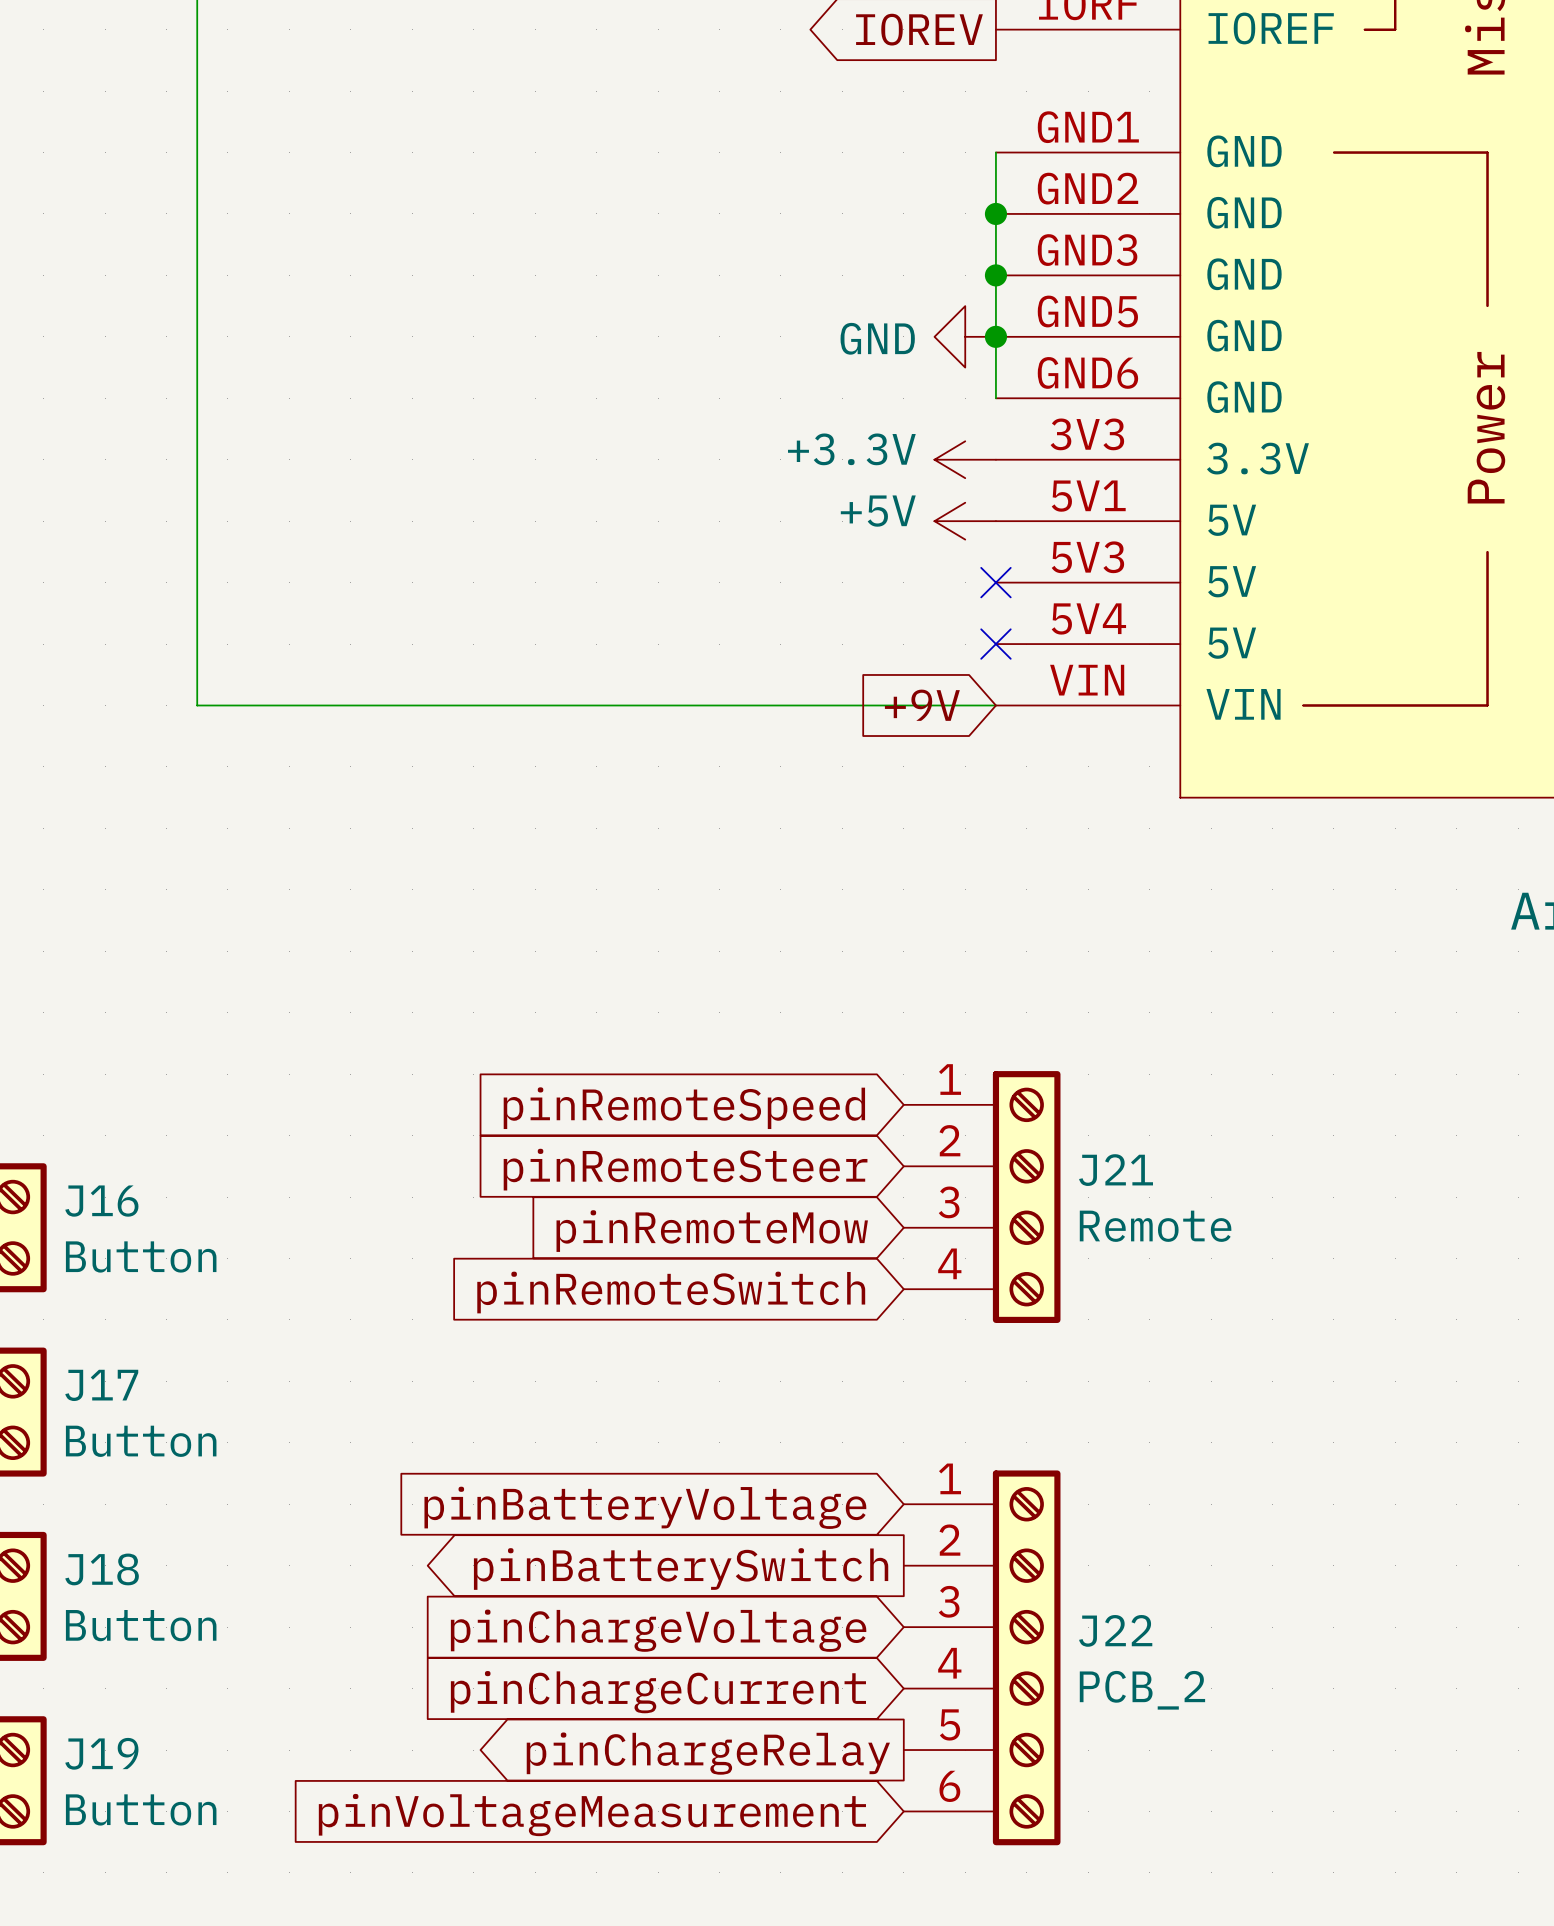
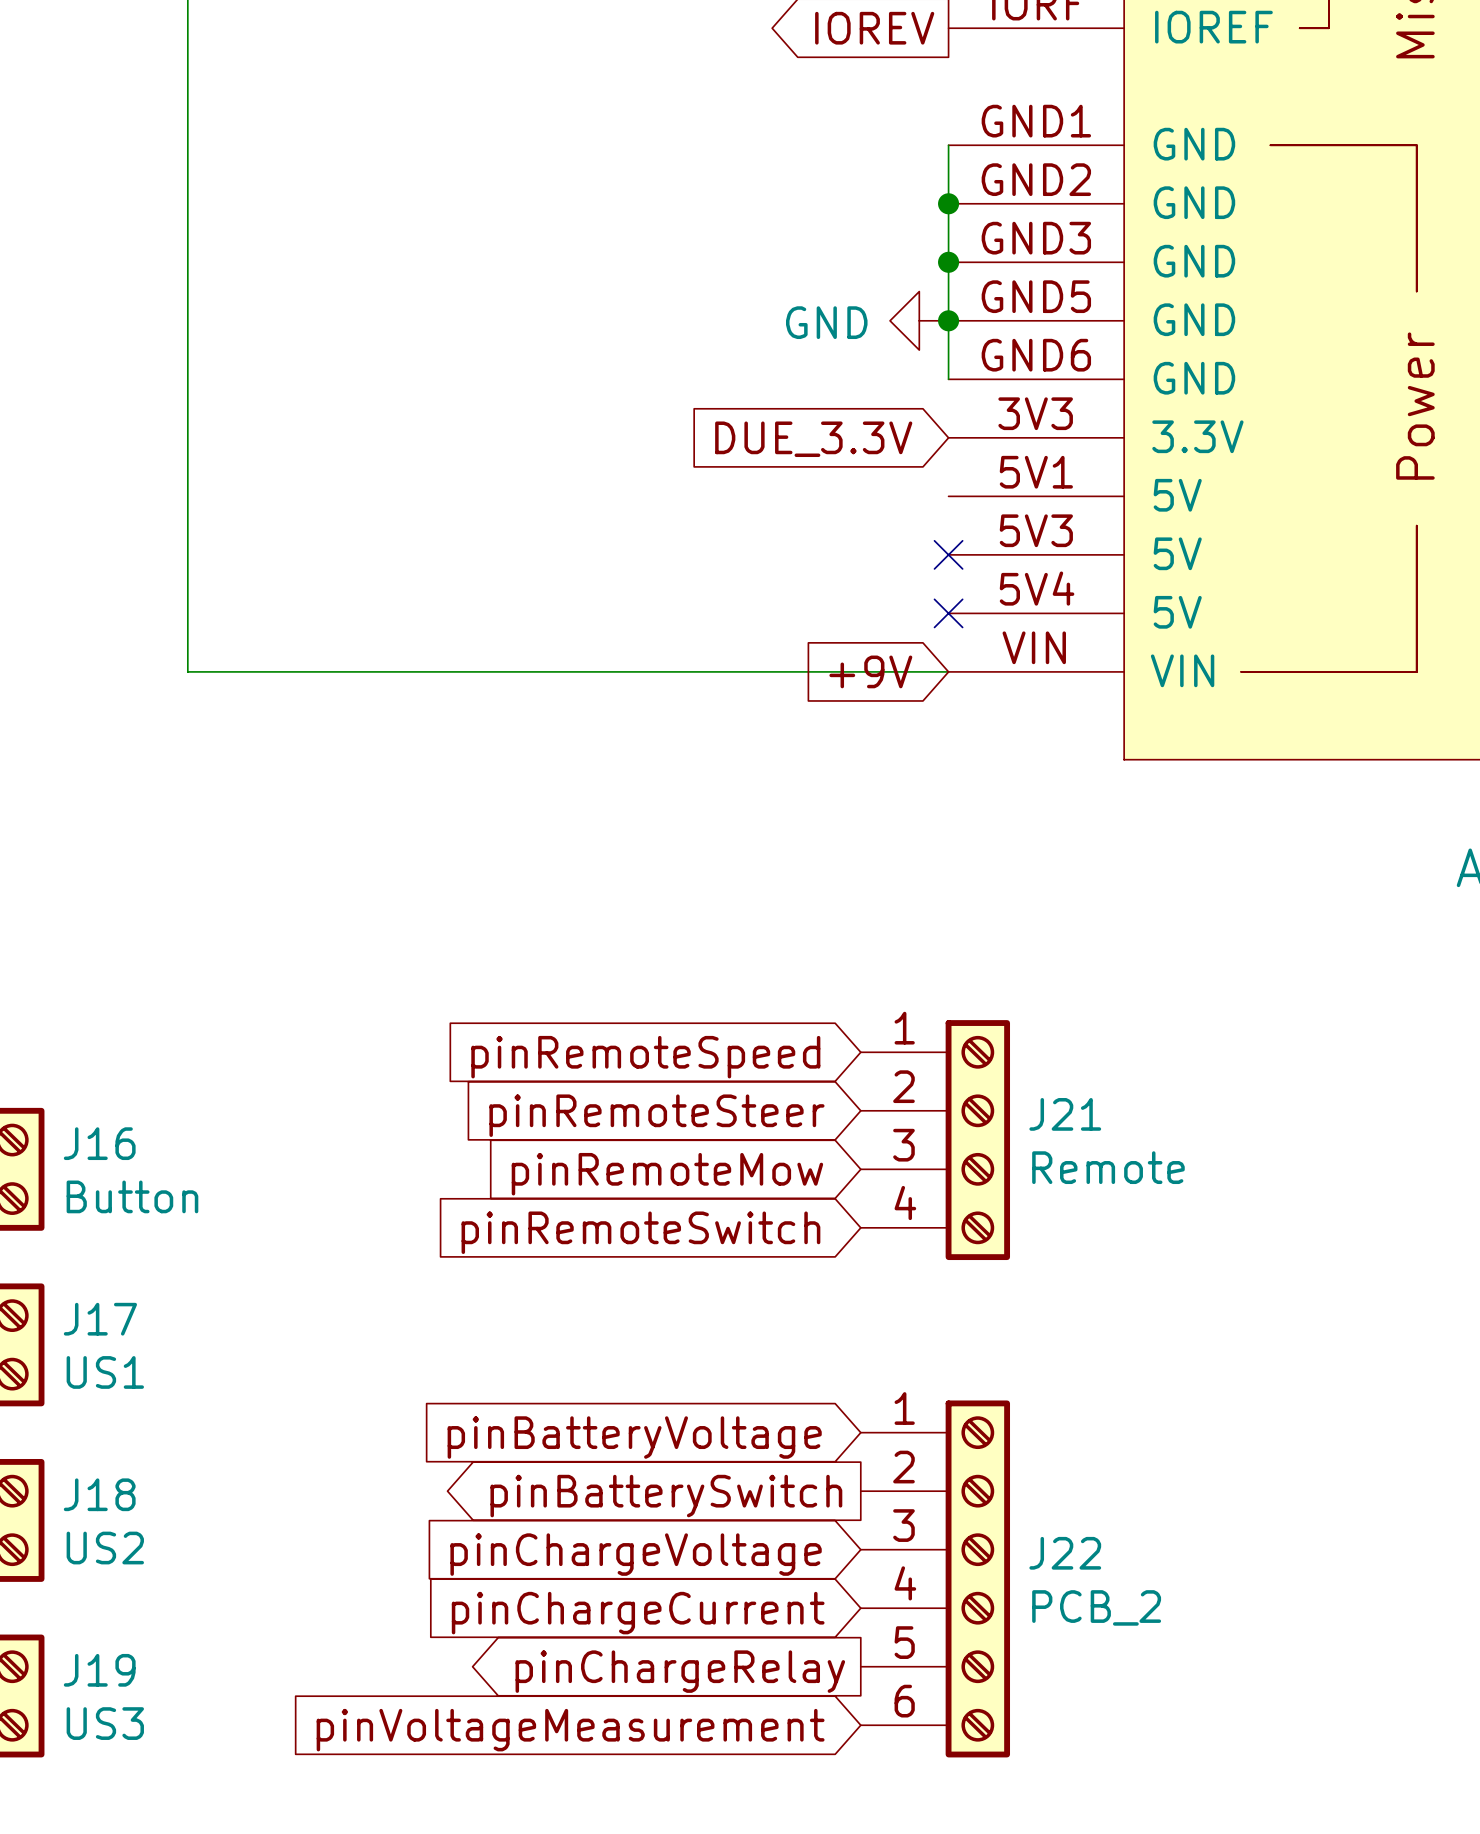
power symbol: +3.3V (965, 459) -> none
global label: none -> DUE_3.3V (813, 439)
power symbol: +5V (965, 521) -> none
J17 value: Button (141, 1441) -> US1 (105, 1372)
J18 value: Button (141, 1625) -> US2 (105, 1548)
J19 value: Button (141, 1809) -> US3 (105, 1723)

